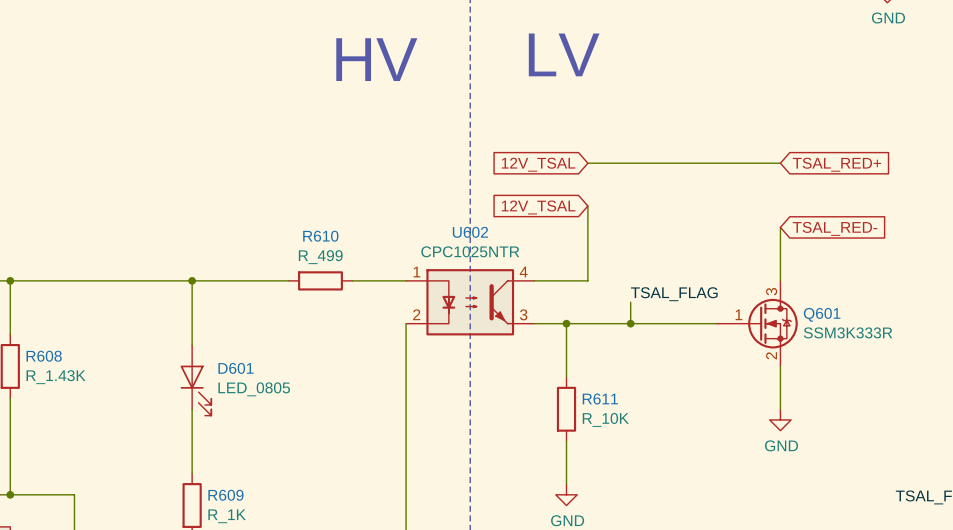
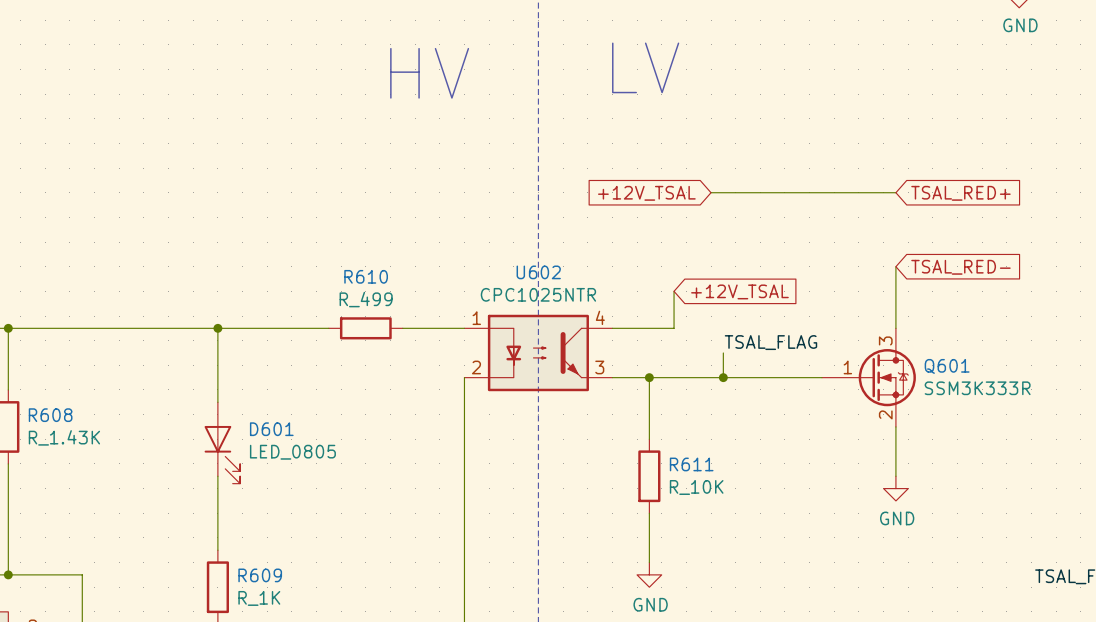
wire: (587, 163) (619, 163) -> none
global label: 12V_TSAL (538, 164) -> +12V_TSAL (646, 193)
wire: (587, 206) (587, 248) -> none
global label: 12V_TSAL (538, 207) -> none
global label: none -> +12V_TSAL (739, 291)

